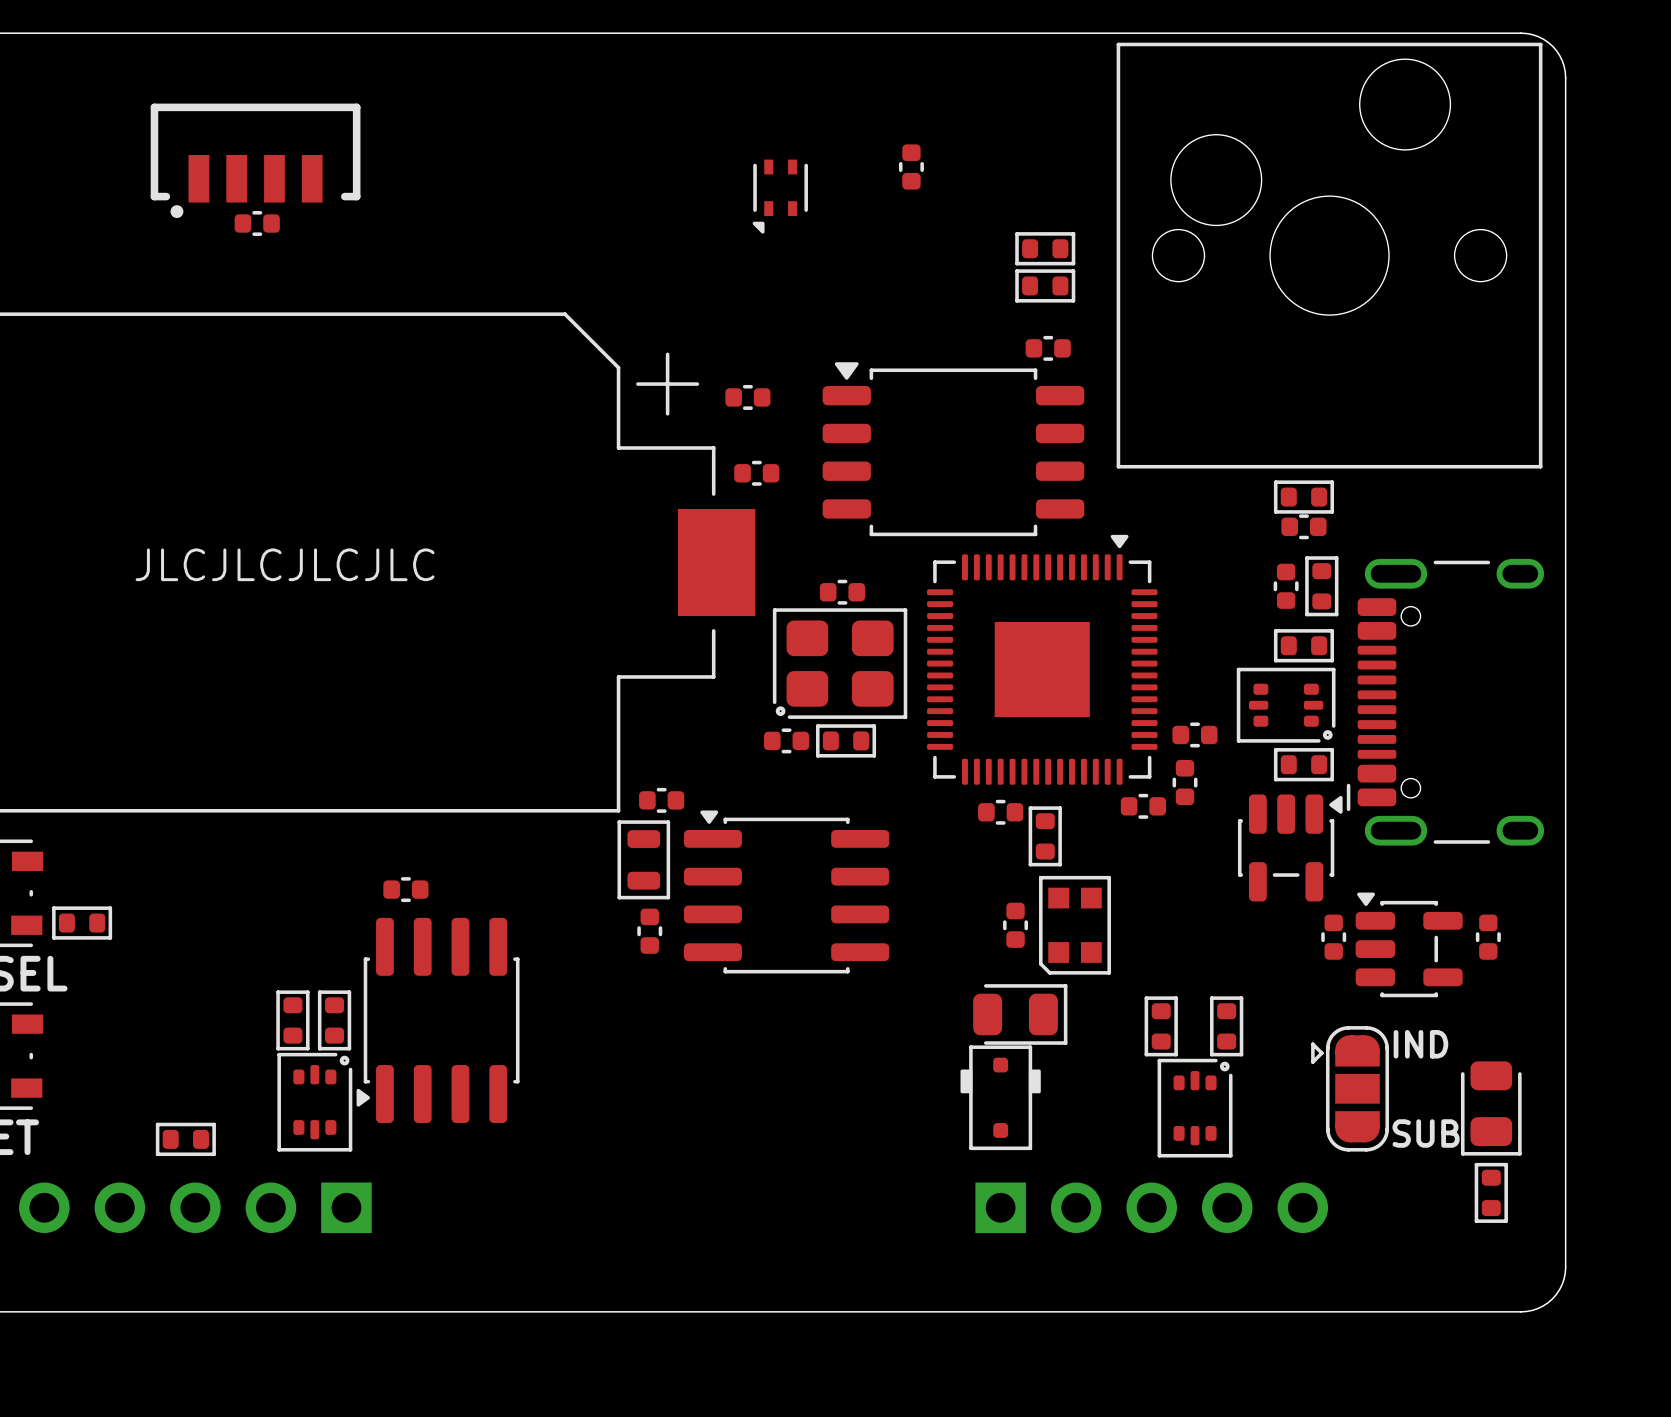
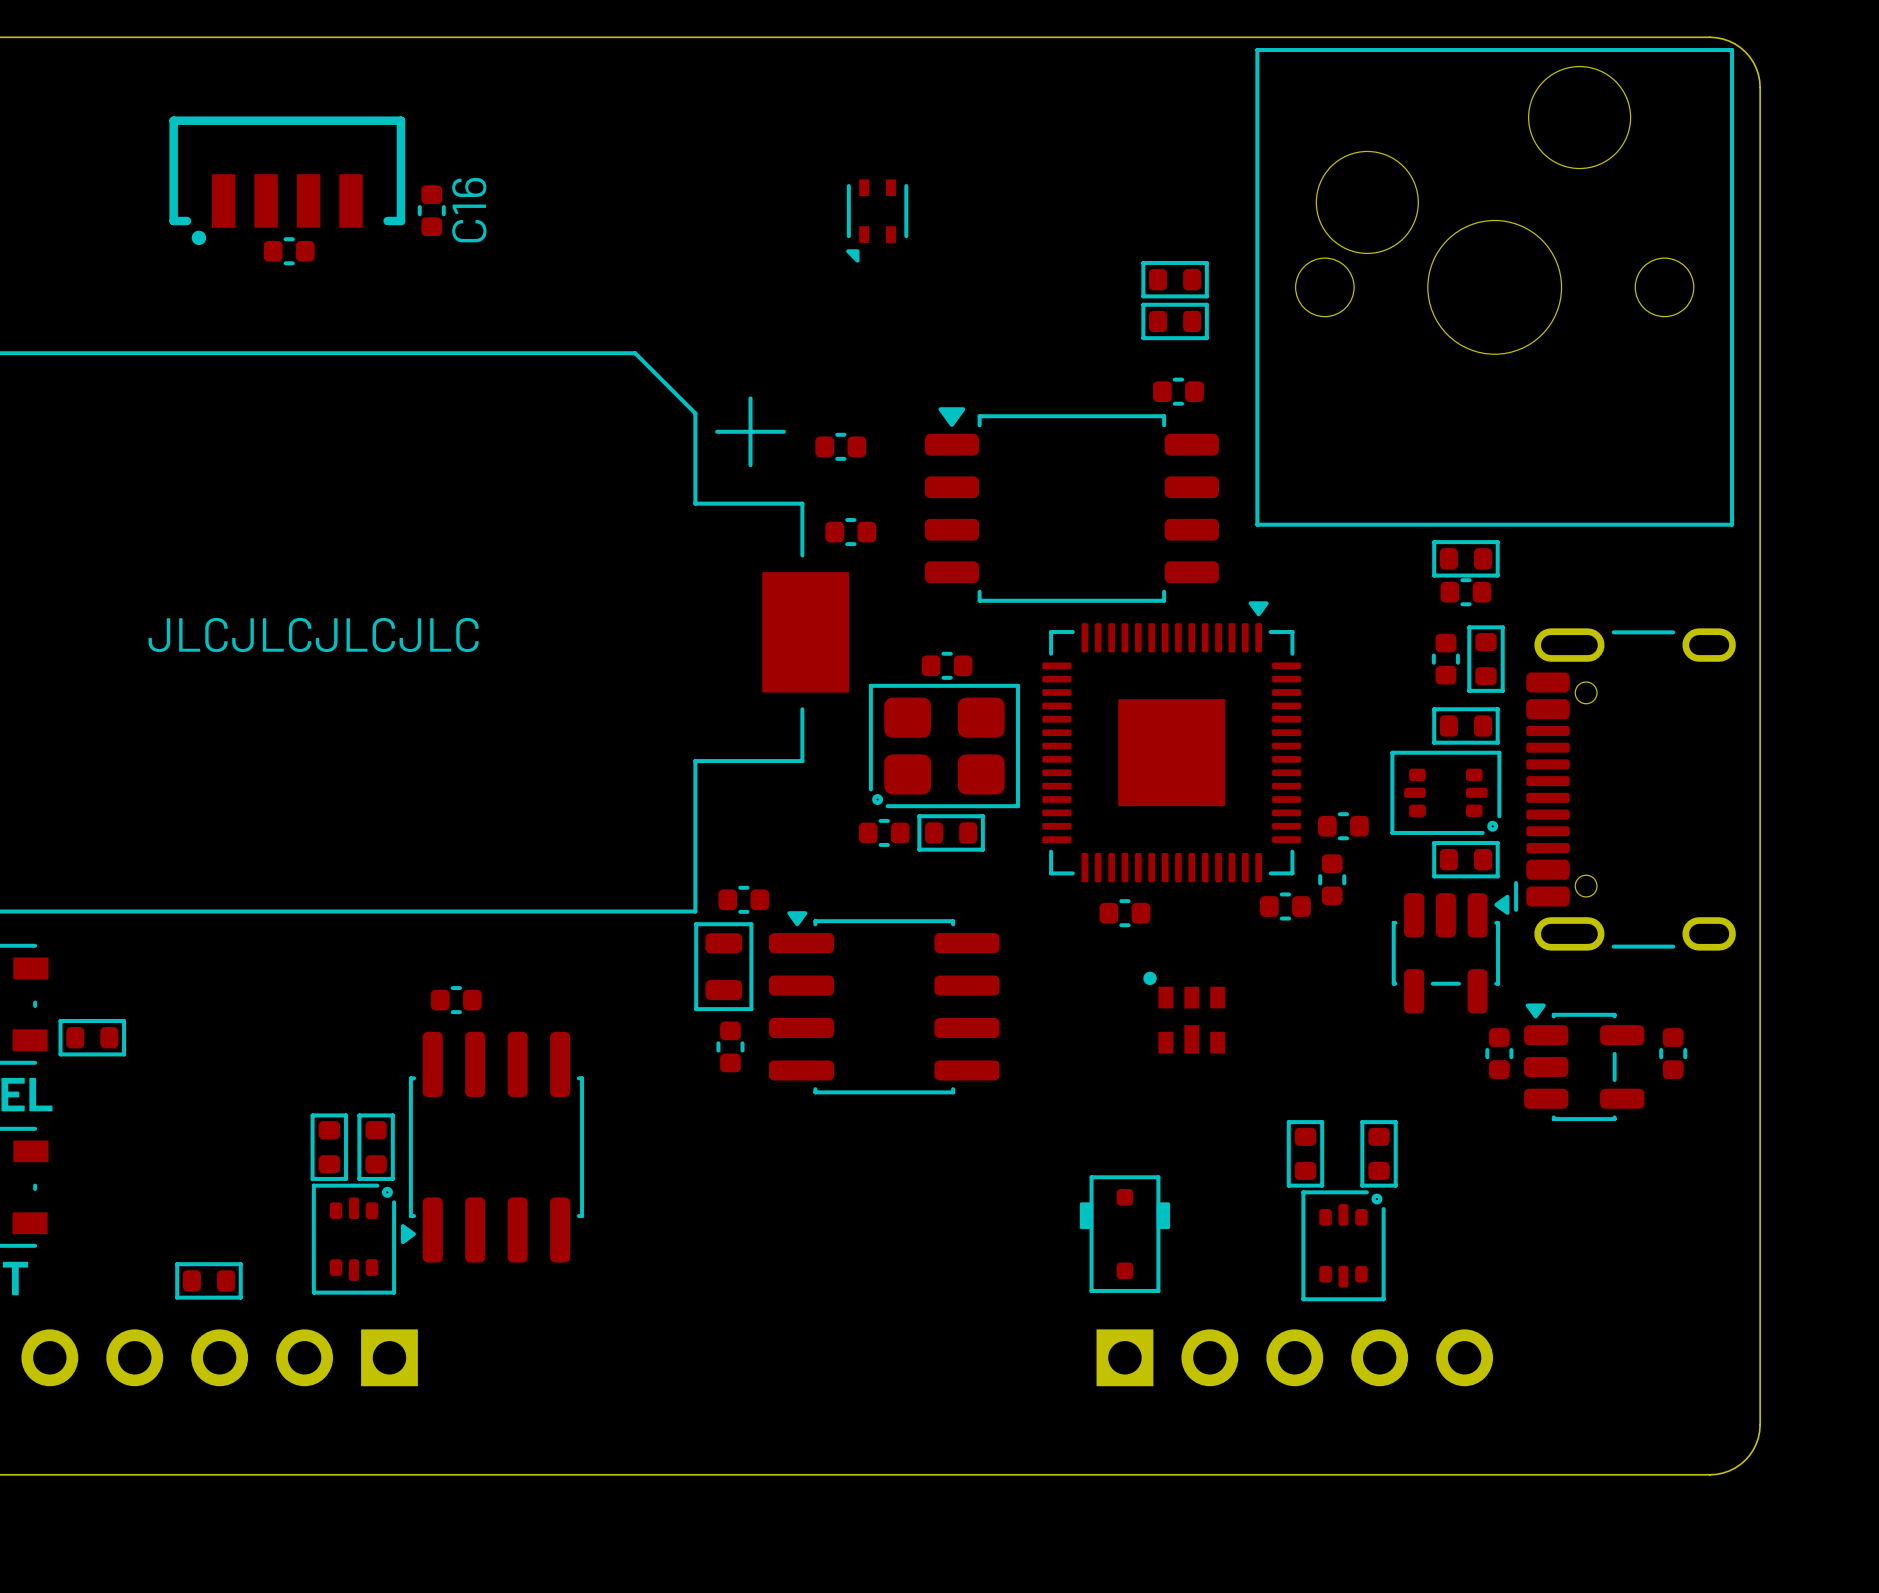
part: (911, 166) -> none
C16: none -> (431, 210)
part: (1045, 836) -> none
part: none -> (1184, 1012)
part: (1015, 925) -> none
part: (1075, 925) -> none
part: (1020, 1014) -> none
text: IND (1420, 1044) -> none
part: (1350, 1088) -> none
part: (1491, 1108) -> none
text: SUB (1426, 1133) -> none
part: (1491, 1192) -> none

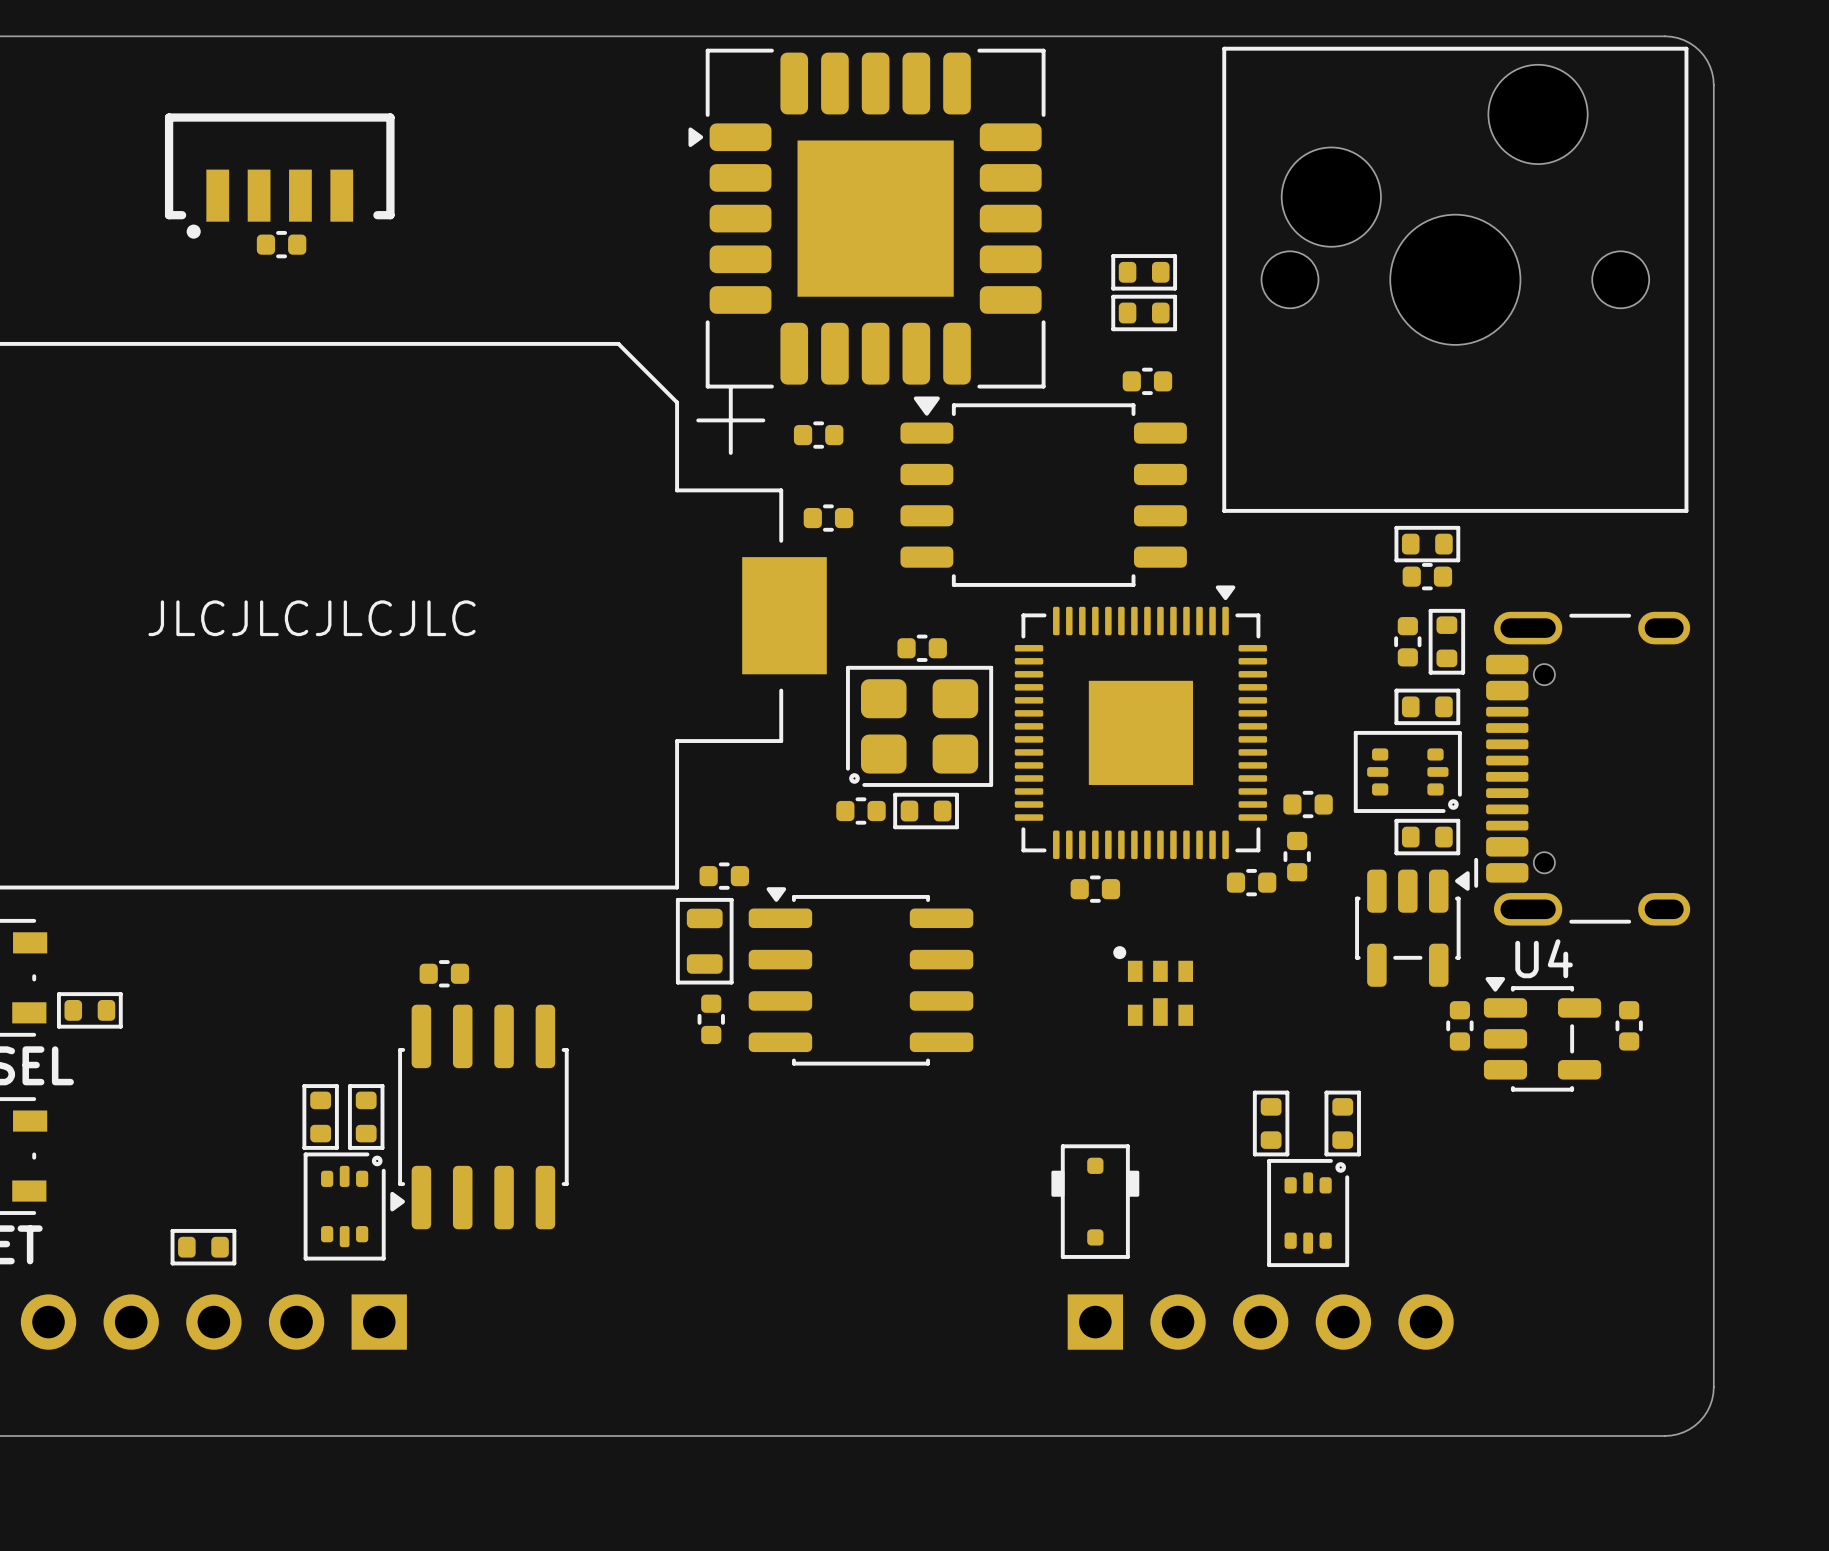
part footprint: [846, 179, 909, 263] -> [688, 48, 1046, 389]
C16: (431, 210) -> none
U4 name: none -> U4 (1544, 958)

